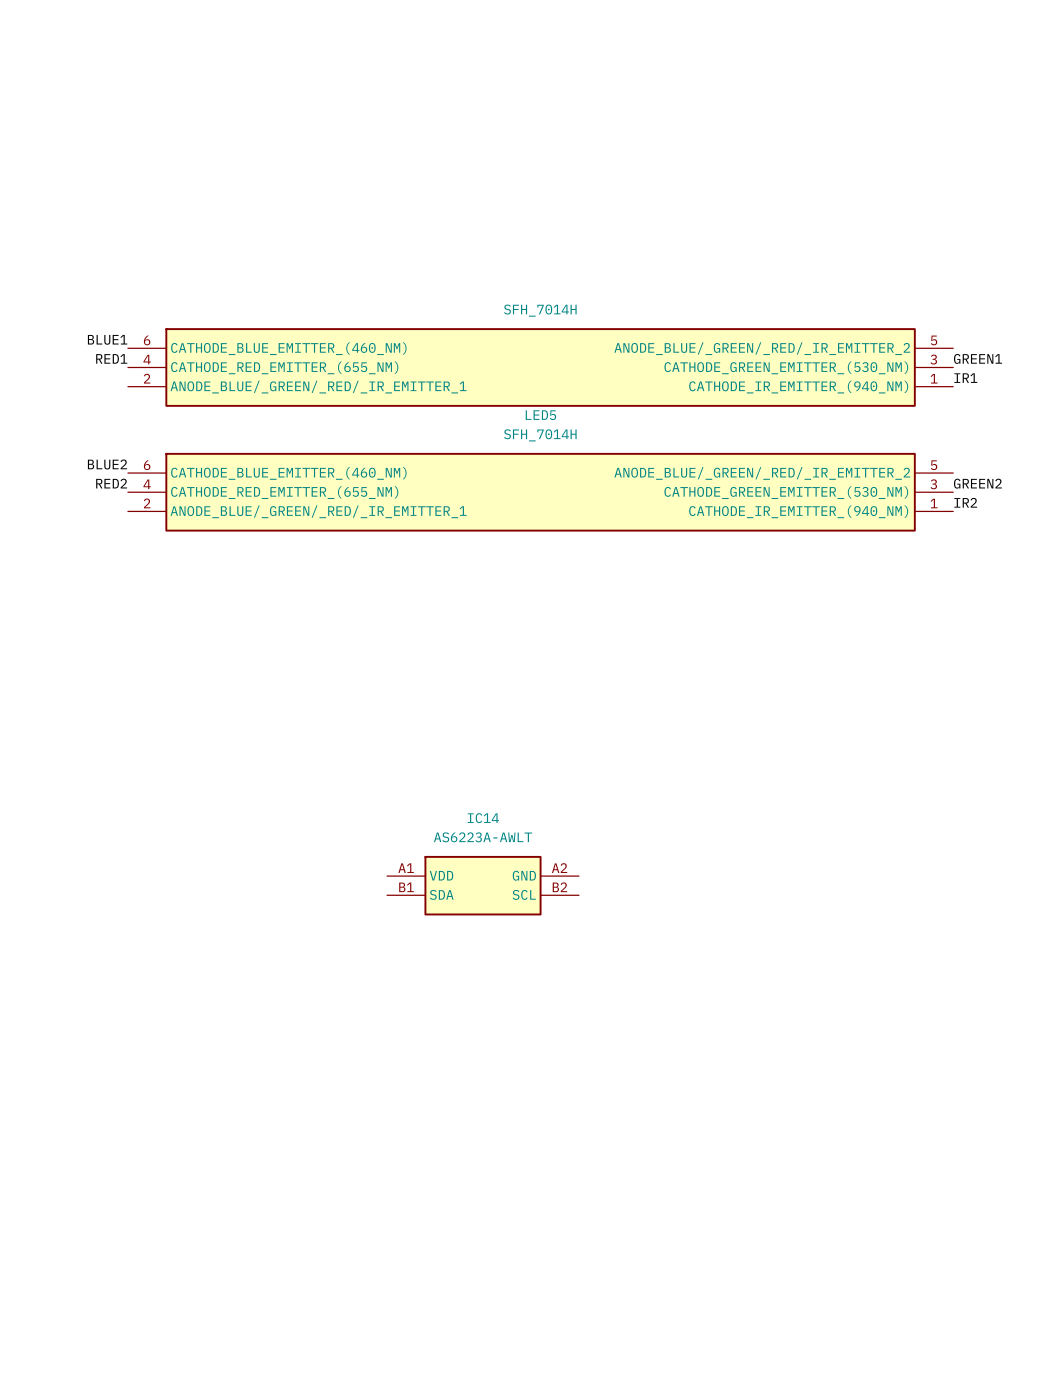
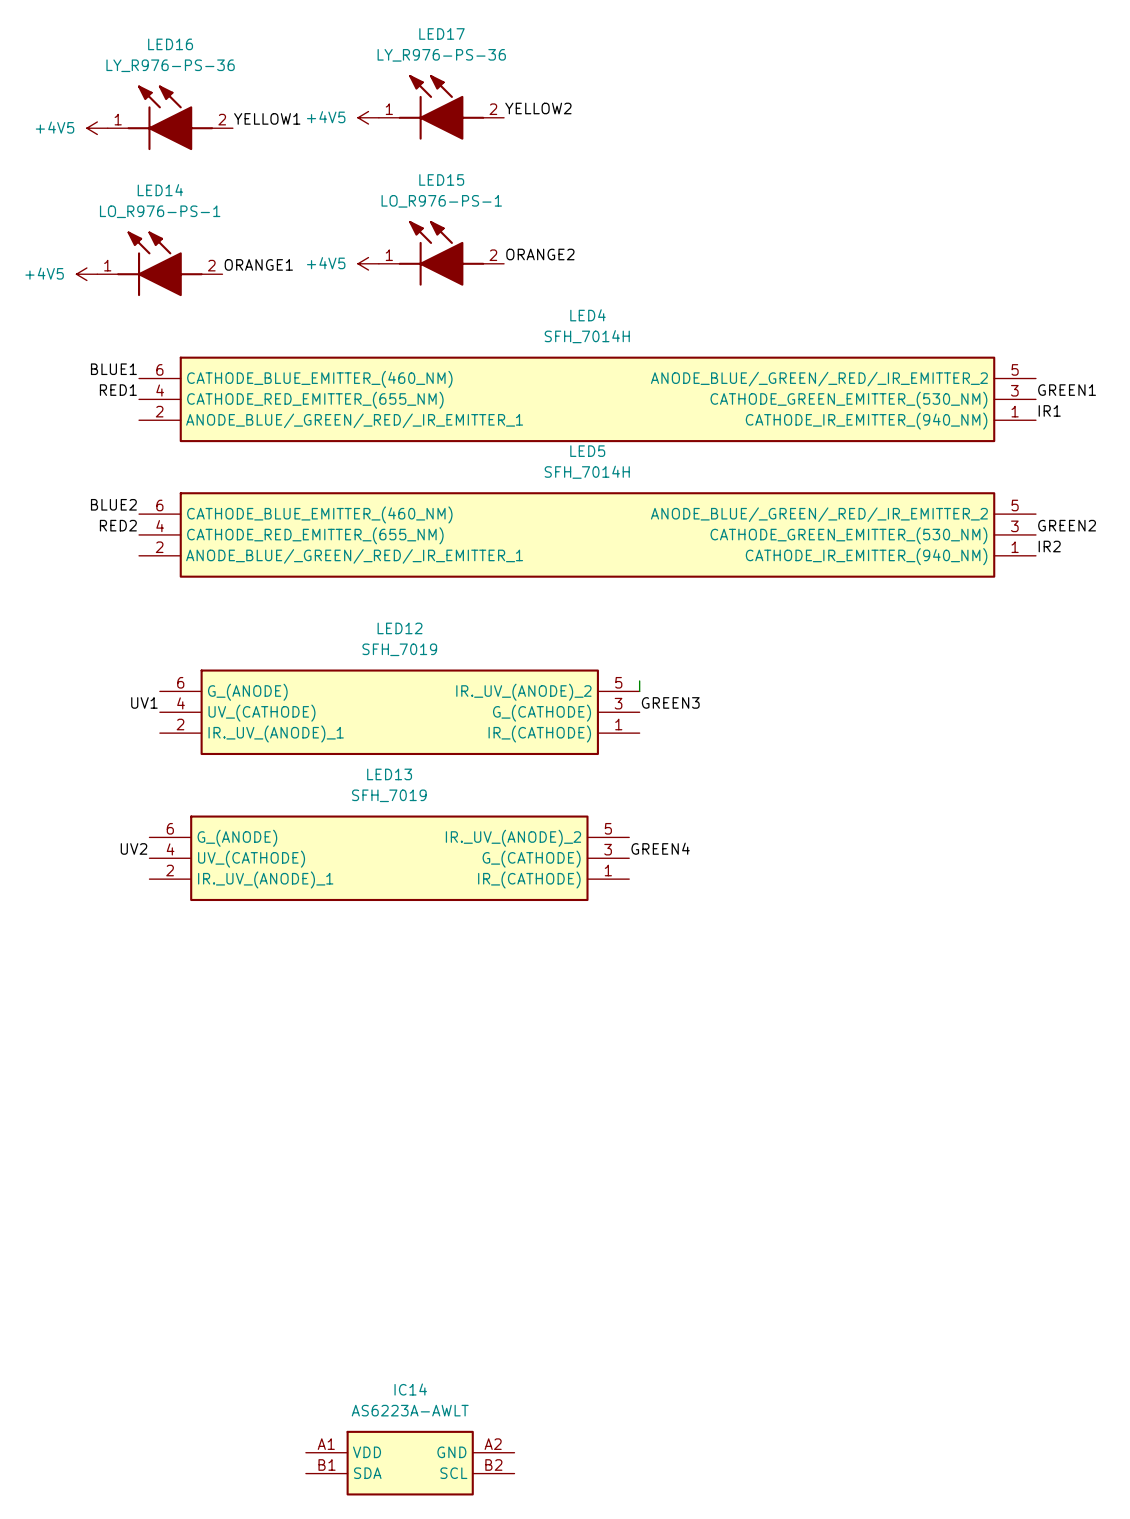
LED17: none -> LY_R976-PS-36 (441, 107)
label: none -> YELLOW2 (538, 108)
LED16: none -> LY_R976-PS-36 (170, 117)
power symbol: none -> +4V5 (368, 117)
label: none -> YELLOW1 (267, 118)
power symbol: none -> +4V5 (97, 128)
LED15: none -> LO_R976-PS-1 (441, 253)
label: none -> ORANGE2 (540, 254)
LED14: none -> LO_R976-PS-1 (159, 263)
power symbol: none -> +4V5 (368, 263)
label: none -> ORANGE1 (258, 264)
power symbol: none -> +4V5 (86, 274)
LED4 name: none -> LED4 (587, 315)
wire: none -> (639, 680) (639, 691)
label: none -> UV1 (144, 702)
label: none -> GREEN3 (670, 702)
LED12: none -> SFH_7019 (399, 712)
label: none -> UV2 (134, 848)
label: none -> GREEN4 (660, 848)
LED13: none -> SFH_7019 (389, 858)
IC14 position: (483, 885) -> (410, 1463)

